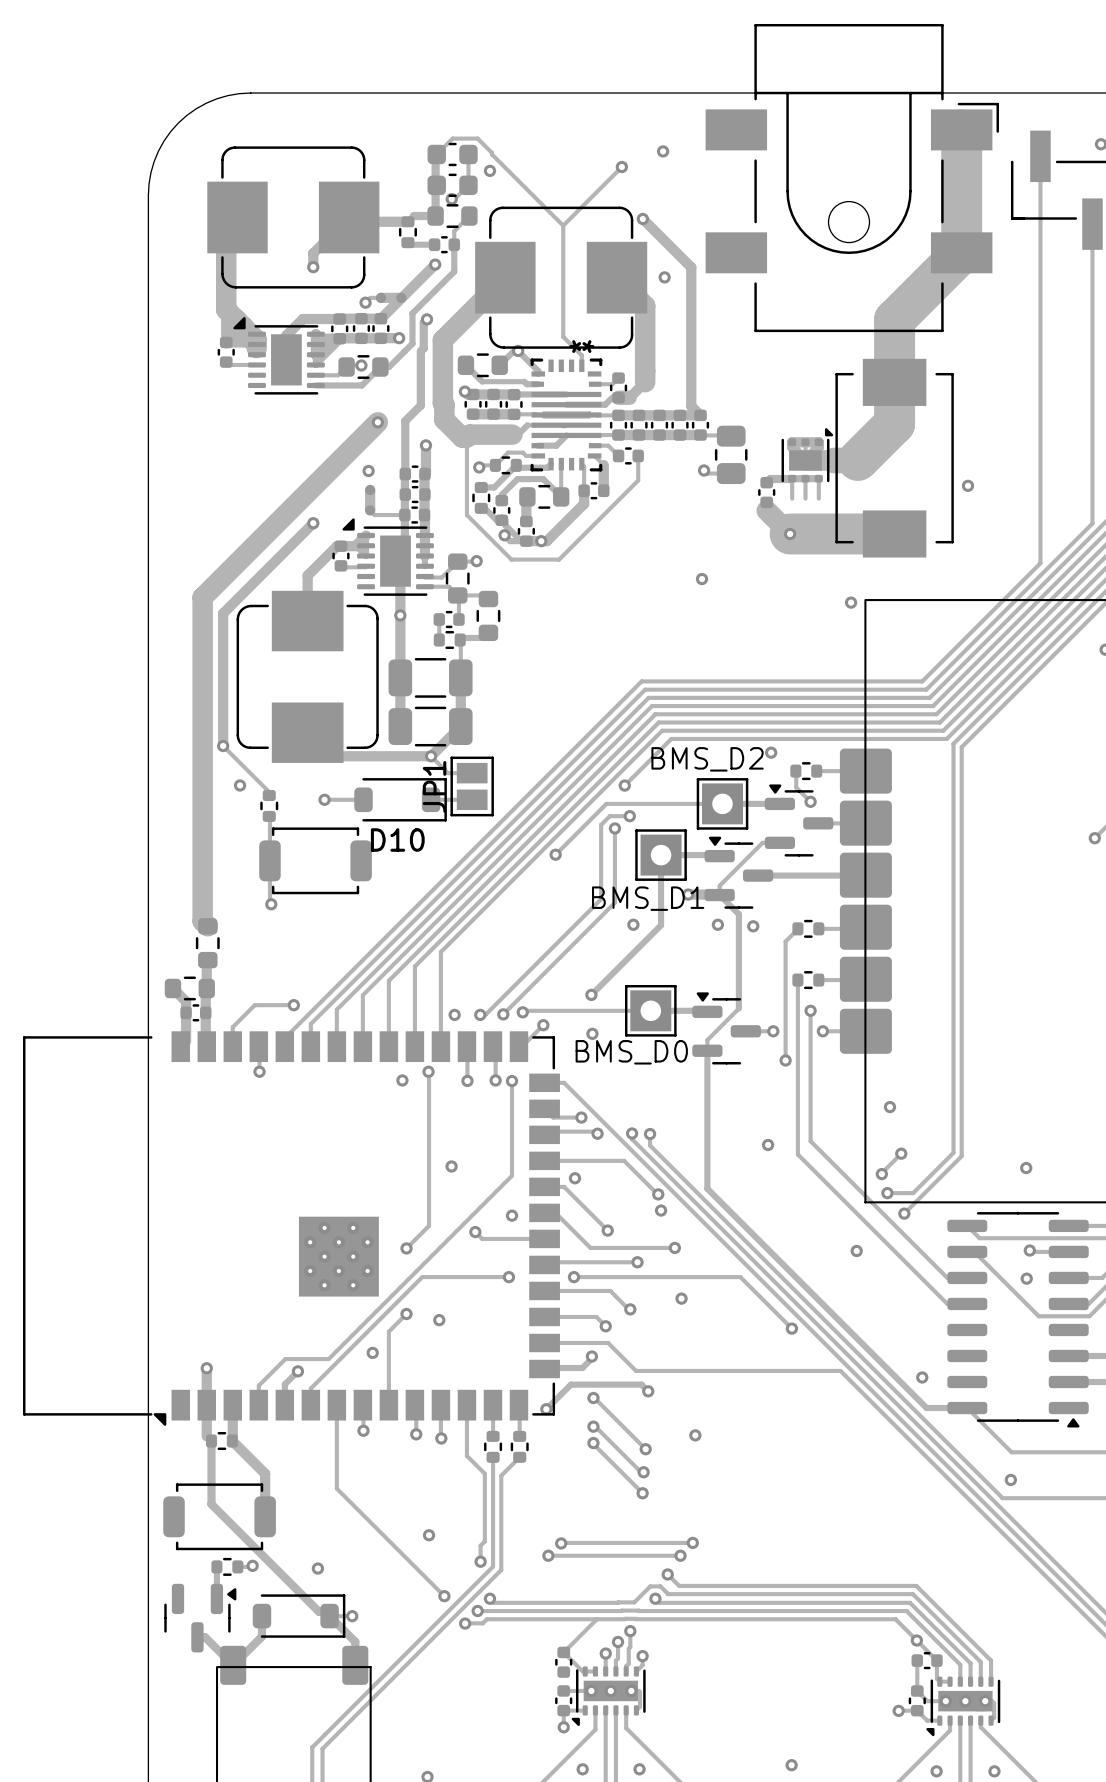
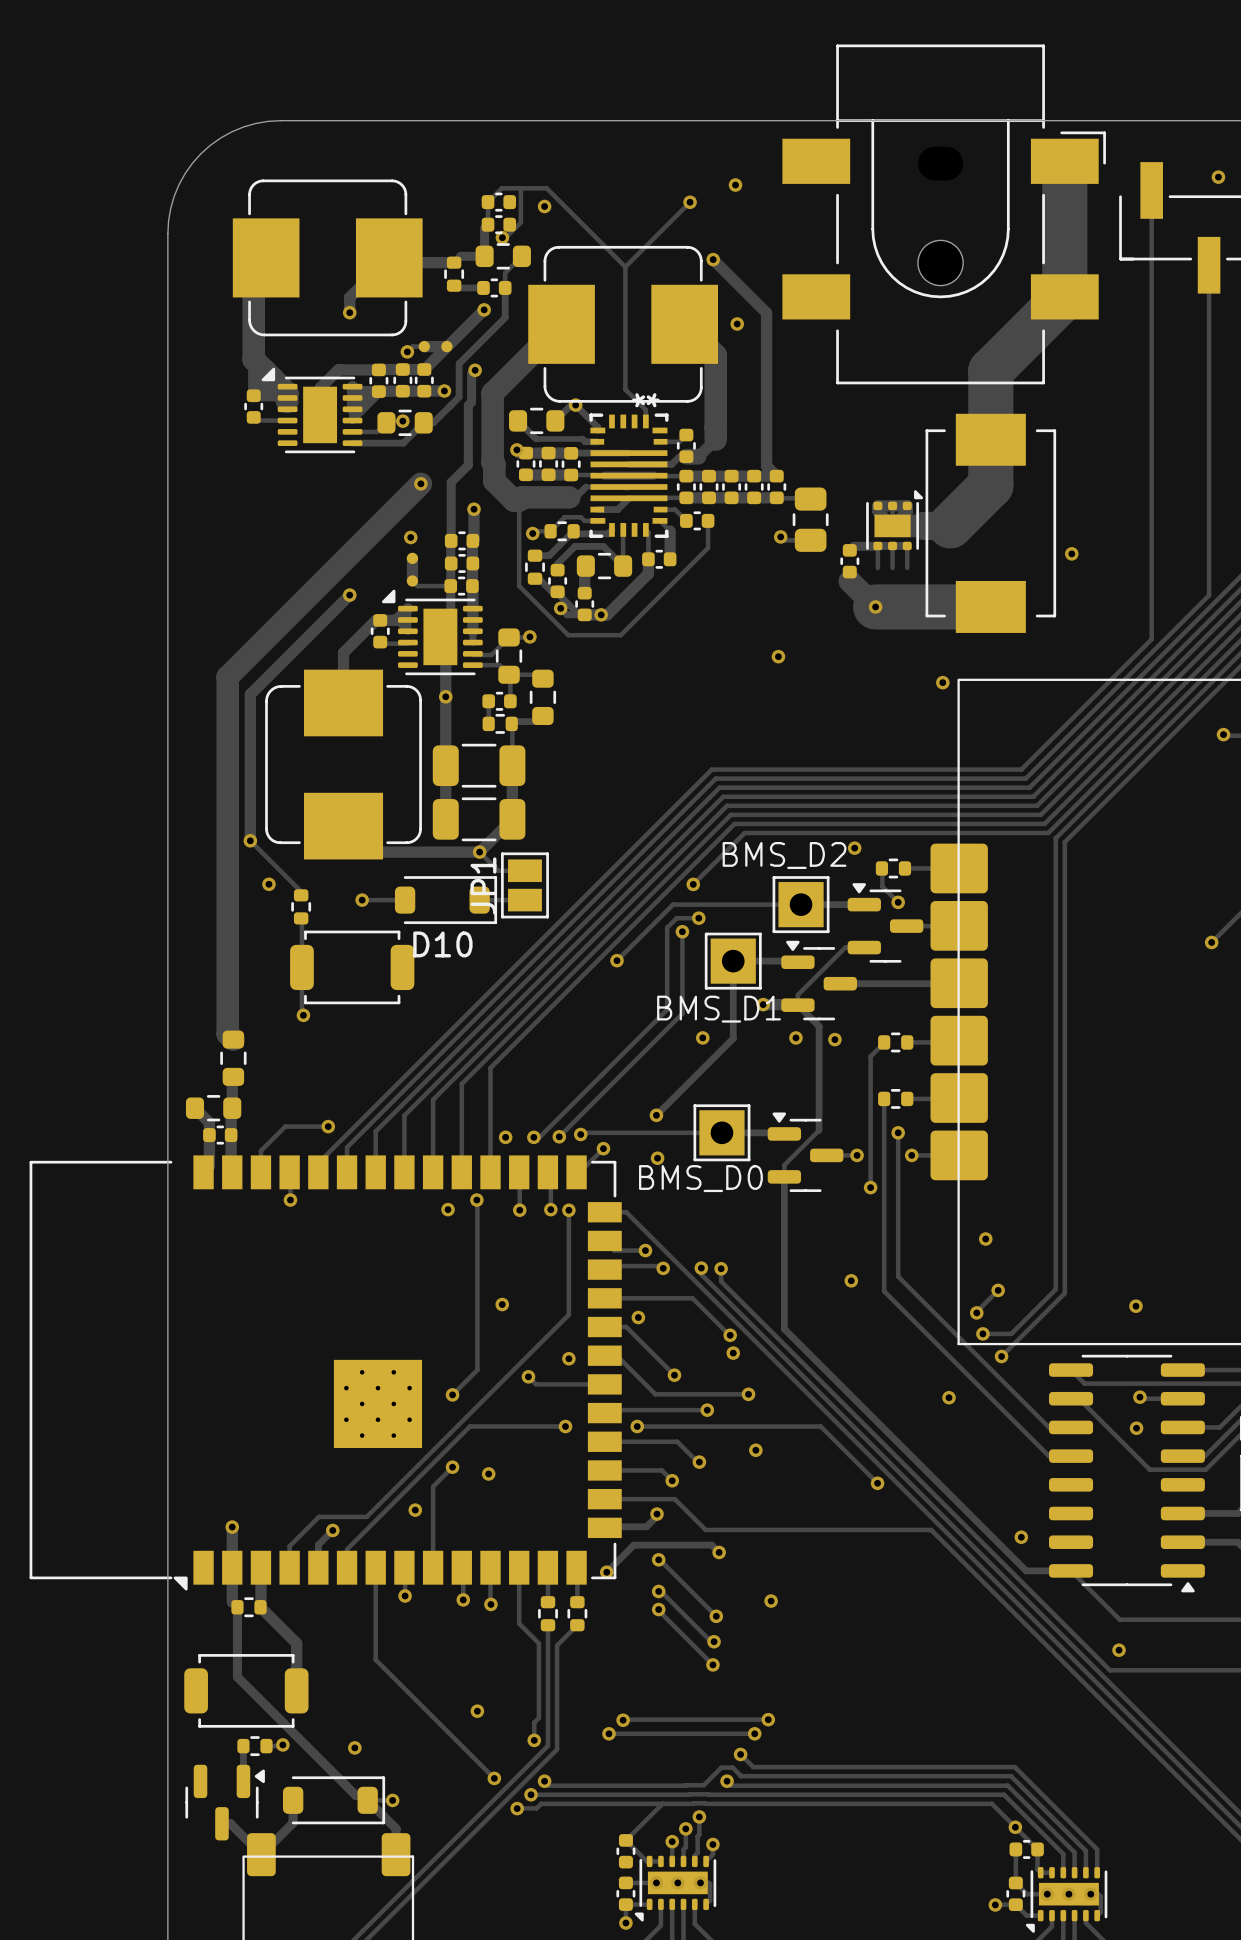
part: (452, 154) -> none
track: (491, 154) (477, 138) (452, 138) (435, 155) (435, 190) -> (546, 188) (501, 188) (488, 202) (488, 224)
part: none -> (498, 202)
part footprint: [427, 173, 478, 197] -> [481, 215, 517, 235]

